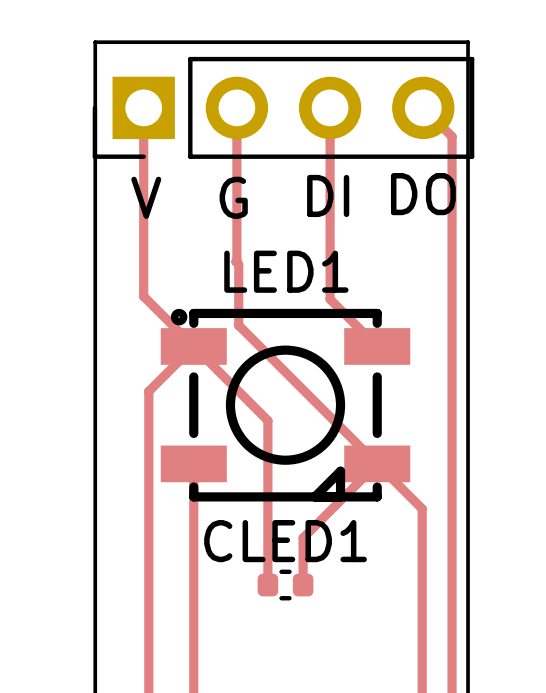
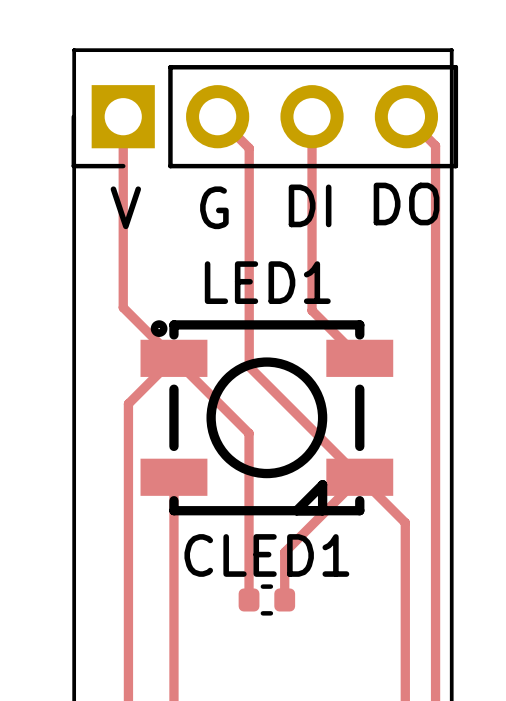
track: (236, 107) (235, 261) (238, 264) (238, 325) (268, 354) -> (217, 116) (249, 148) (249, 366)

